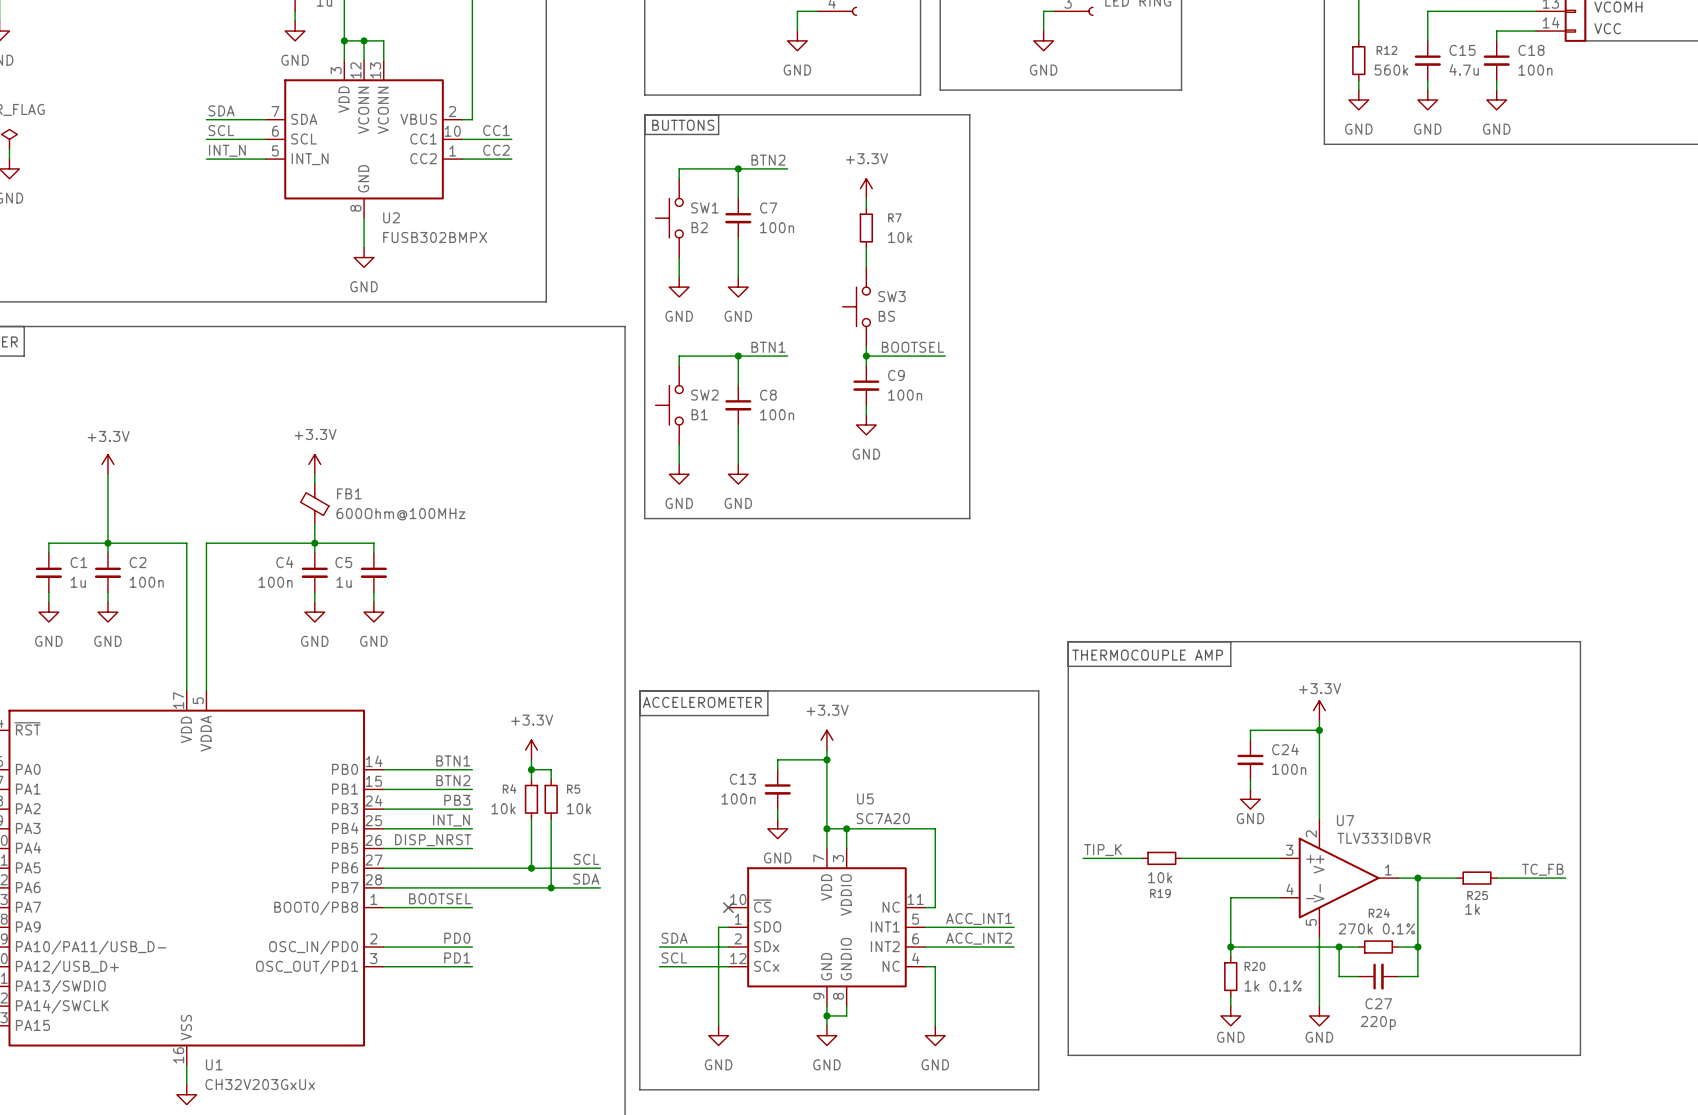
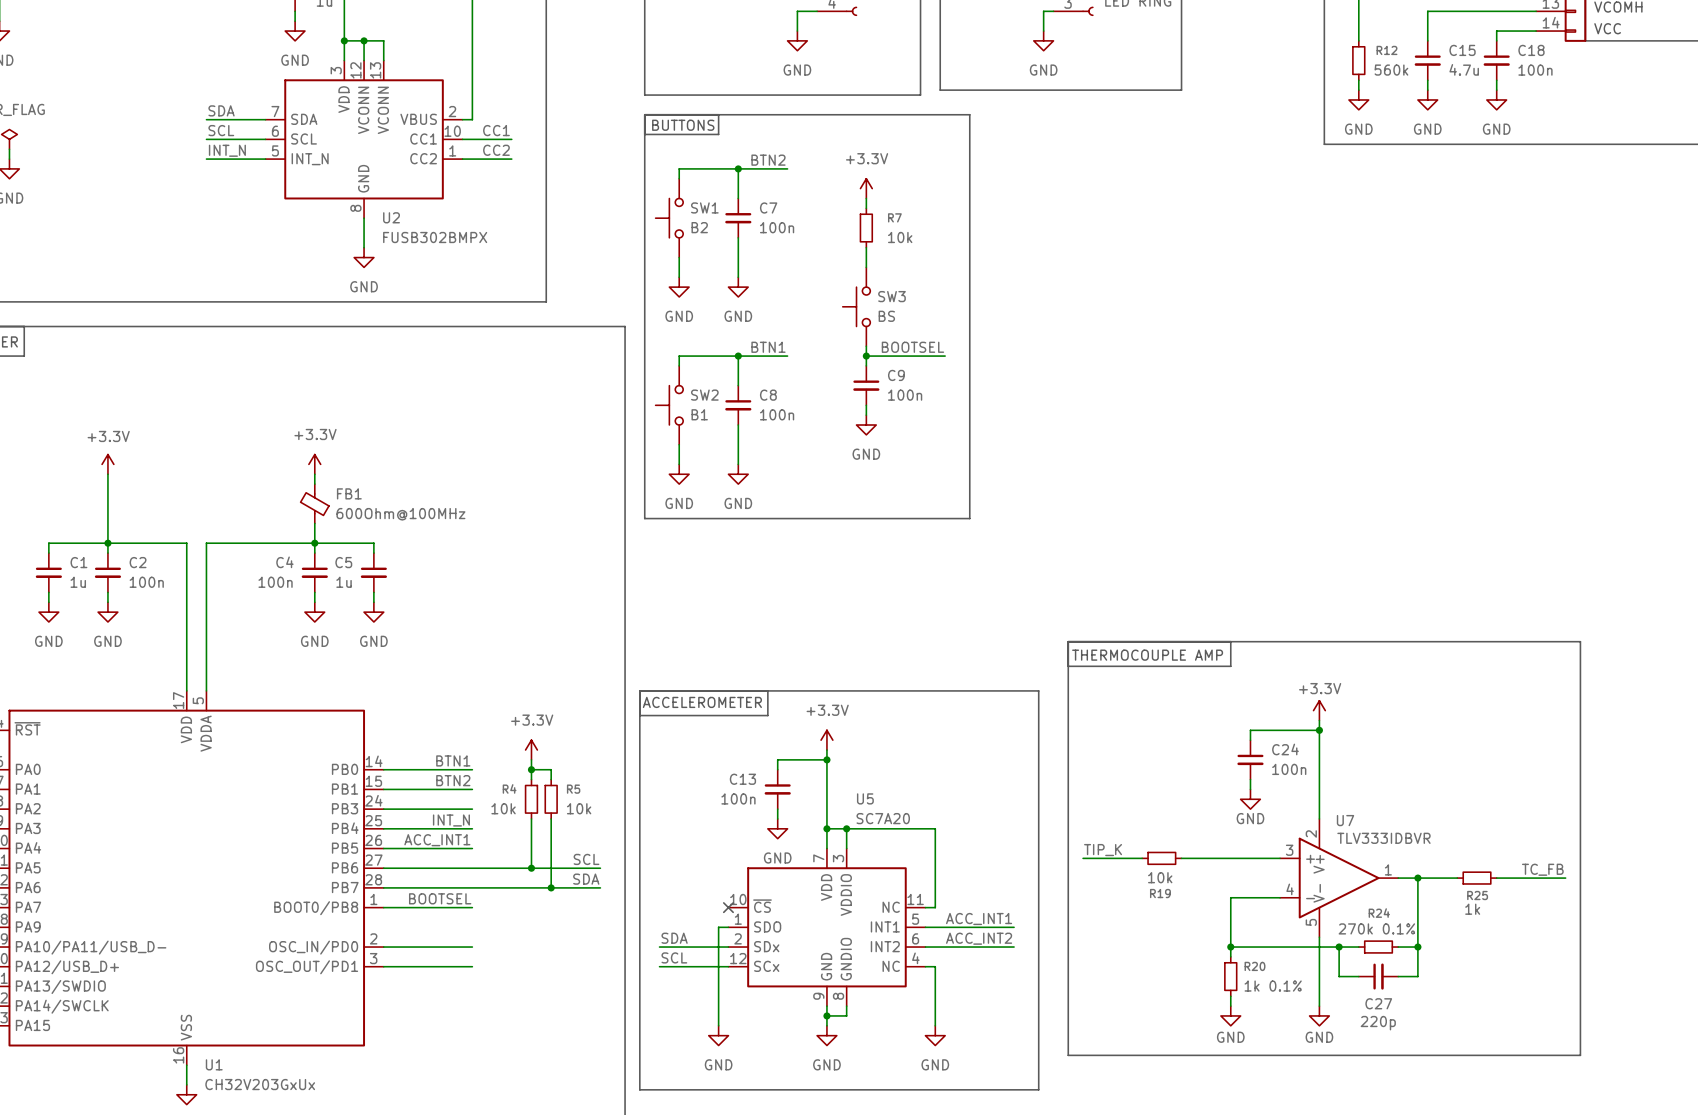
label: PB3 (457, 800) -> none
label: DISP_NRST (433, 840) -> ACC_INT1 (437, 840)
label: PD0 (457, 938) -> none
label: PD1 (457, 957) -> none

